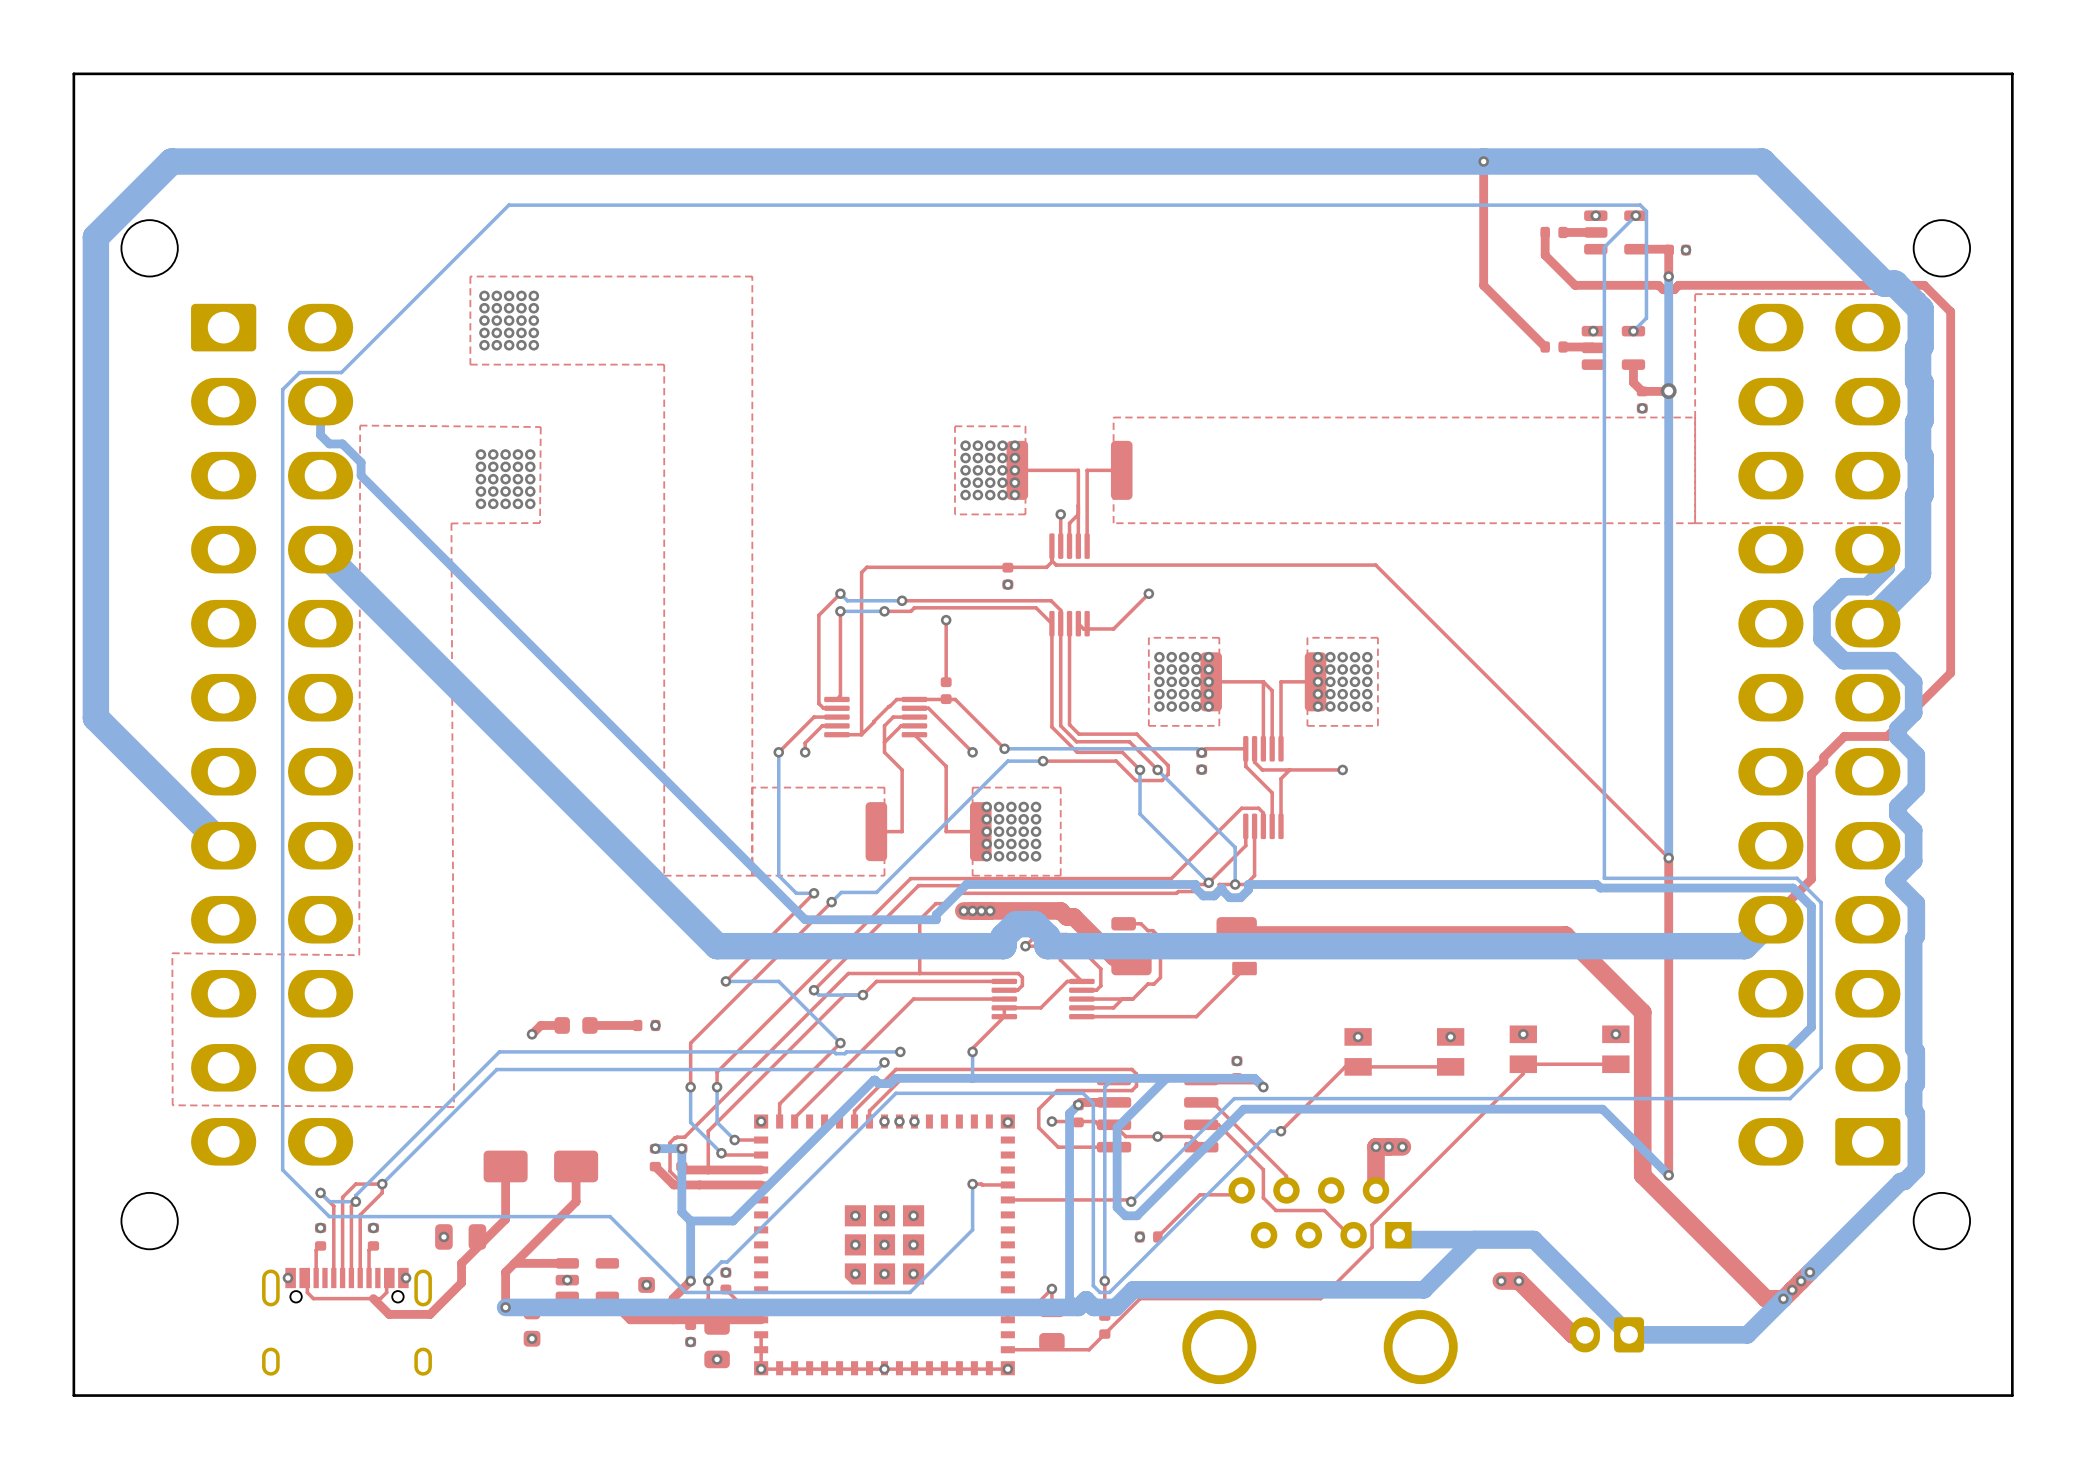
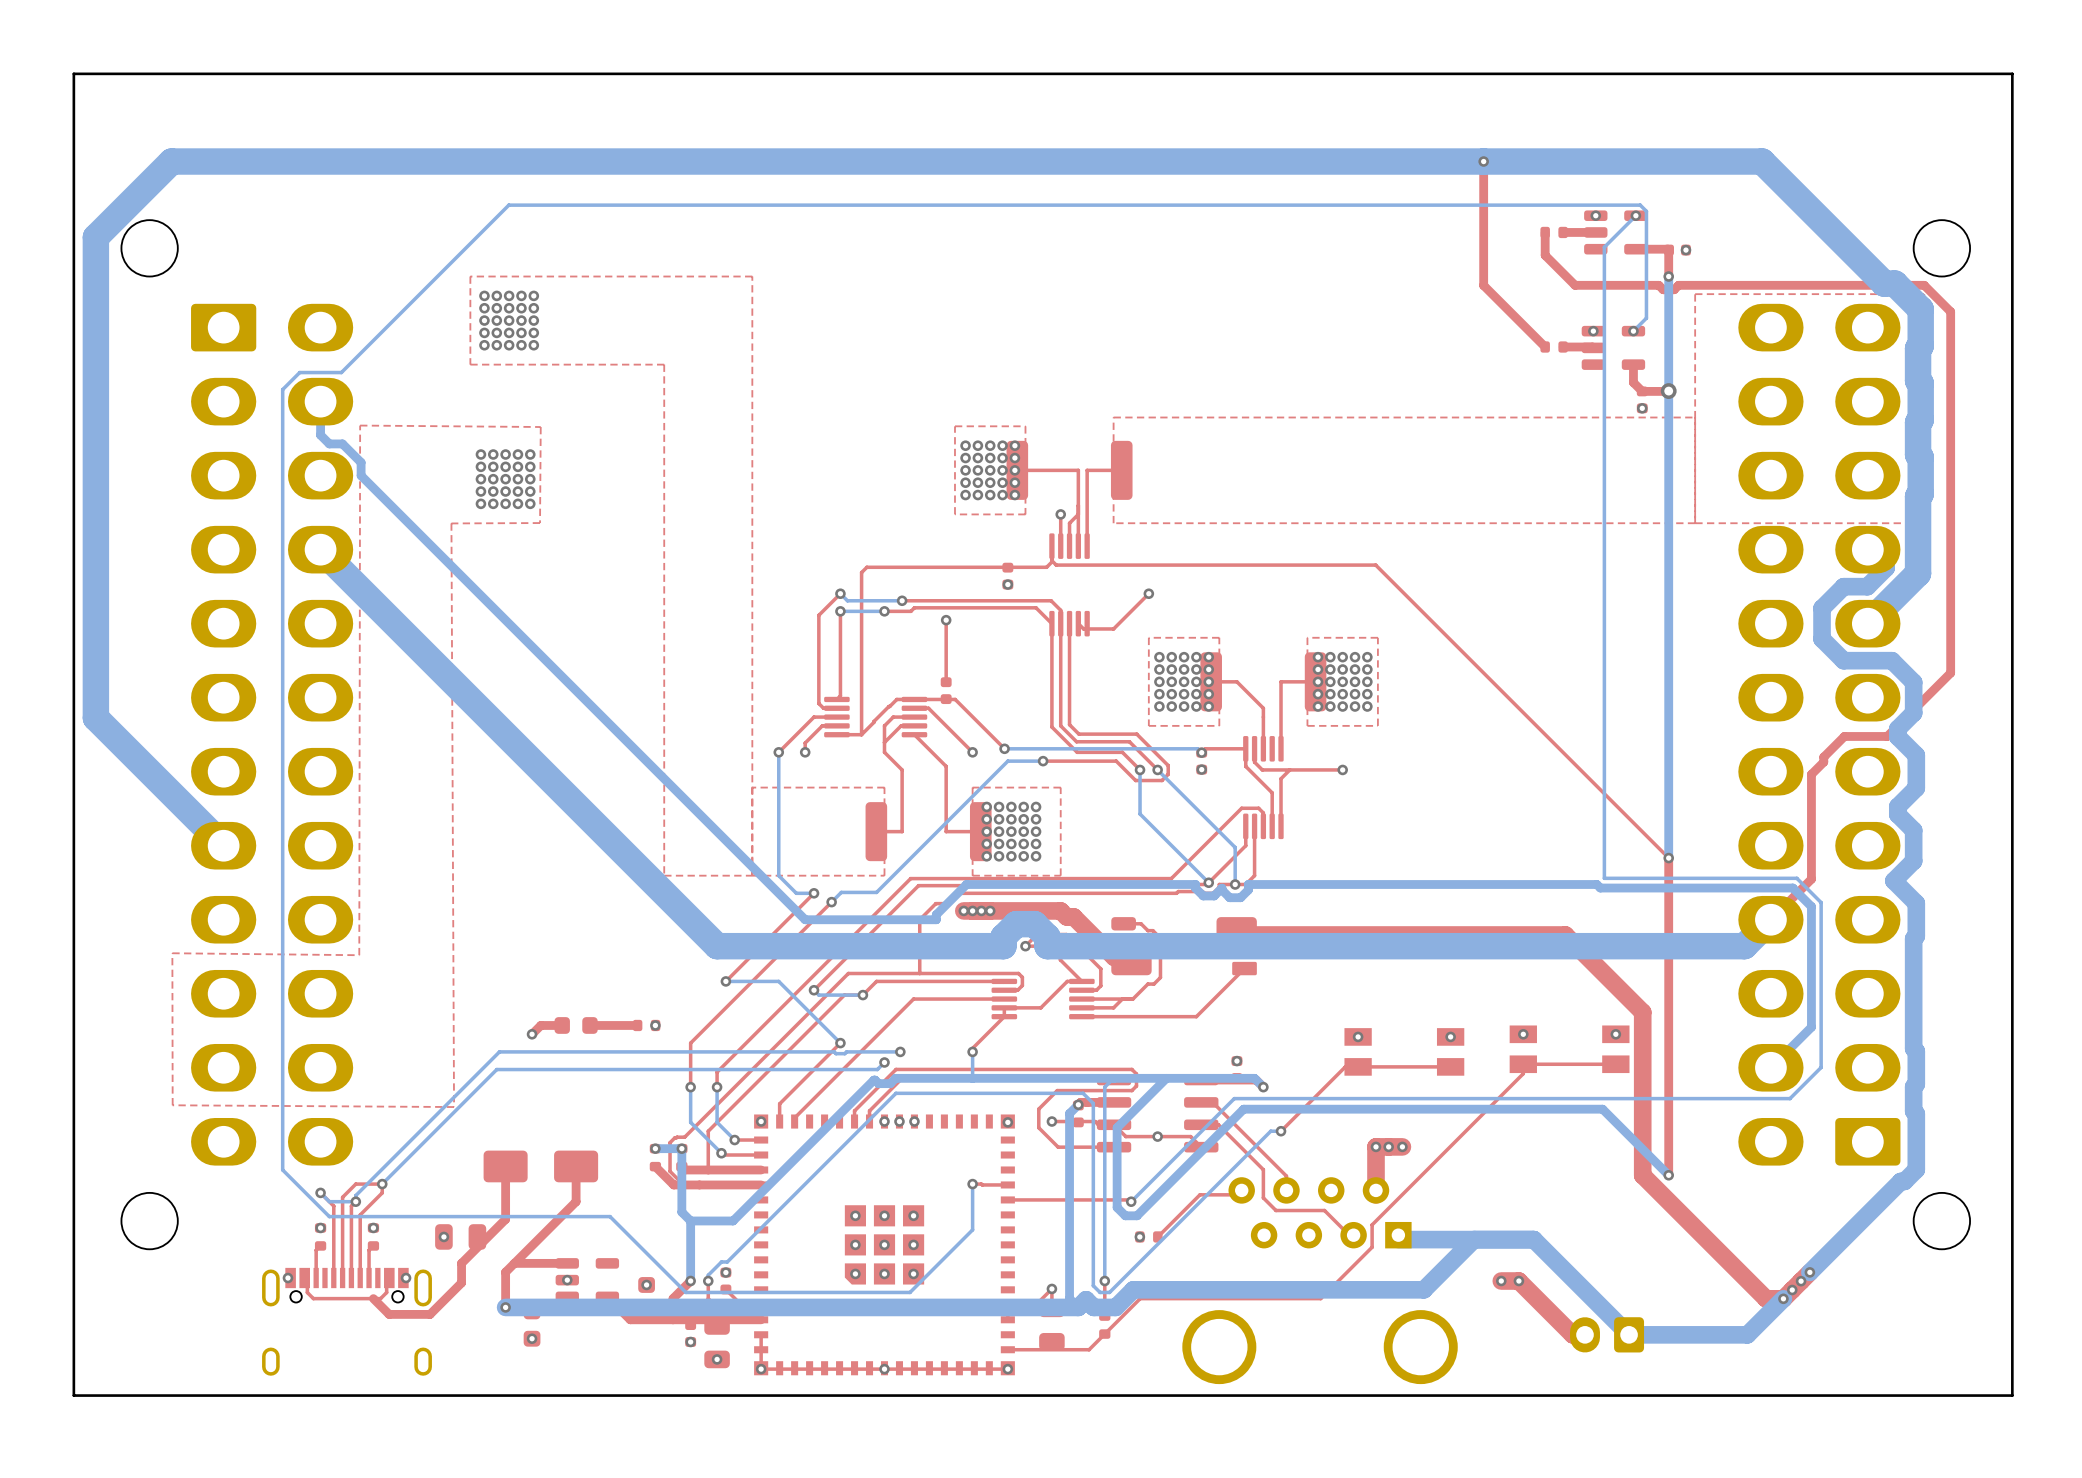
top track: (1263, 681) (1263, 708) -> (1236, 681) (1263, 708)
top track: (1263, 681) (1272, 690) (1272, 748) -> none
top track: (1263, 681) (1236, 681) -> none

